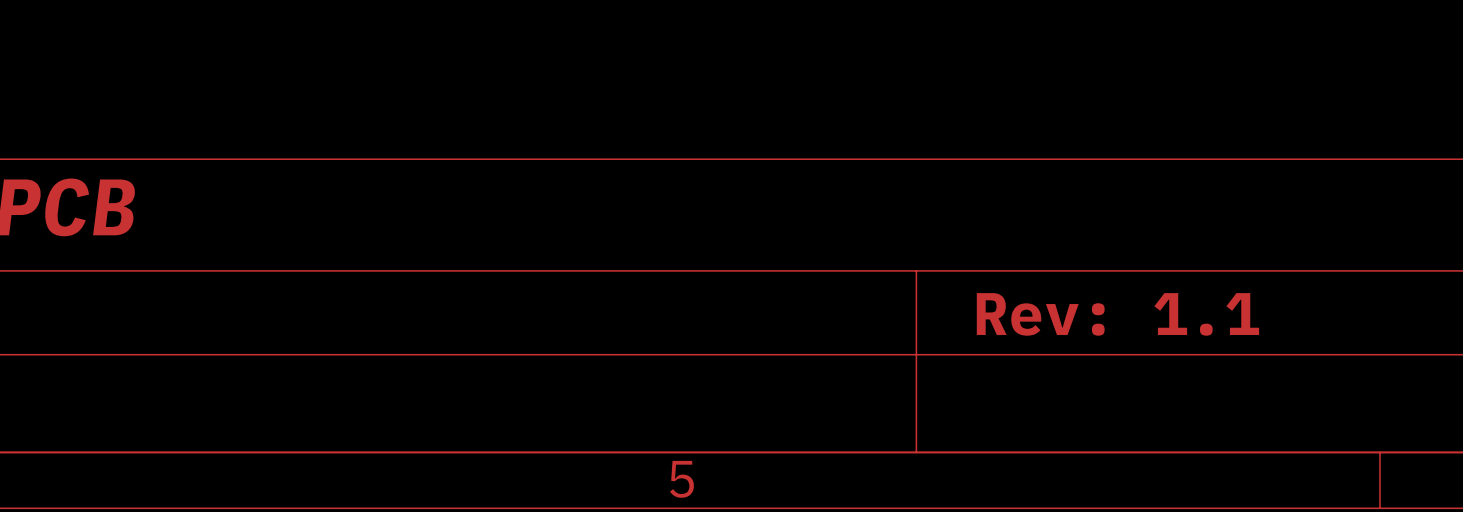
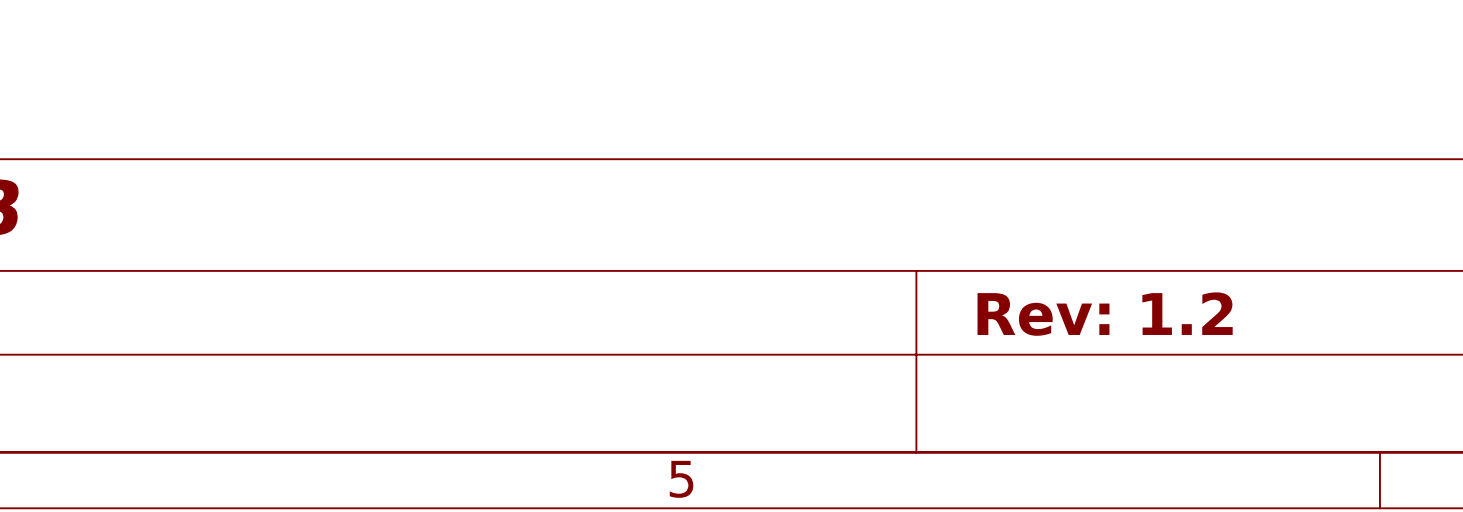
title block: Rev: 1.1 (1117, 314) -> Rev: 1.2 (1105, 314)

